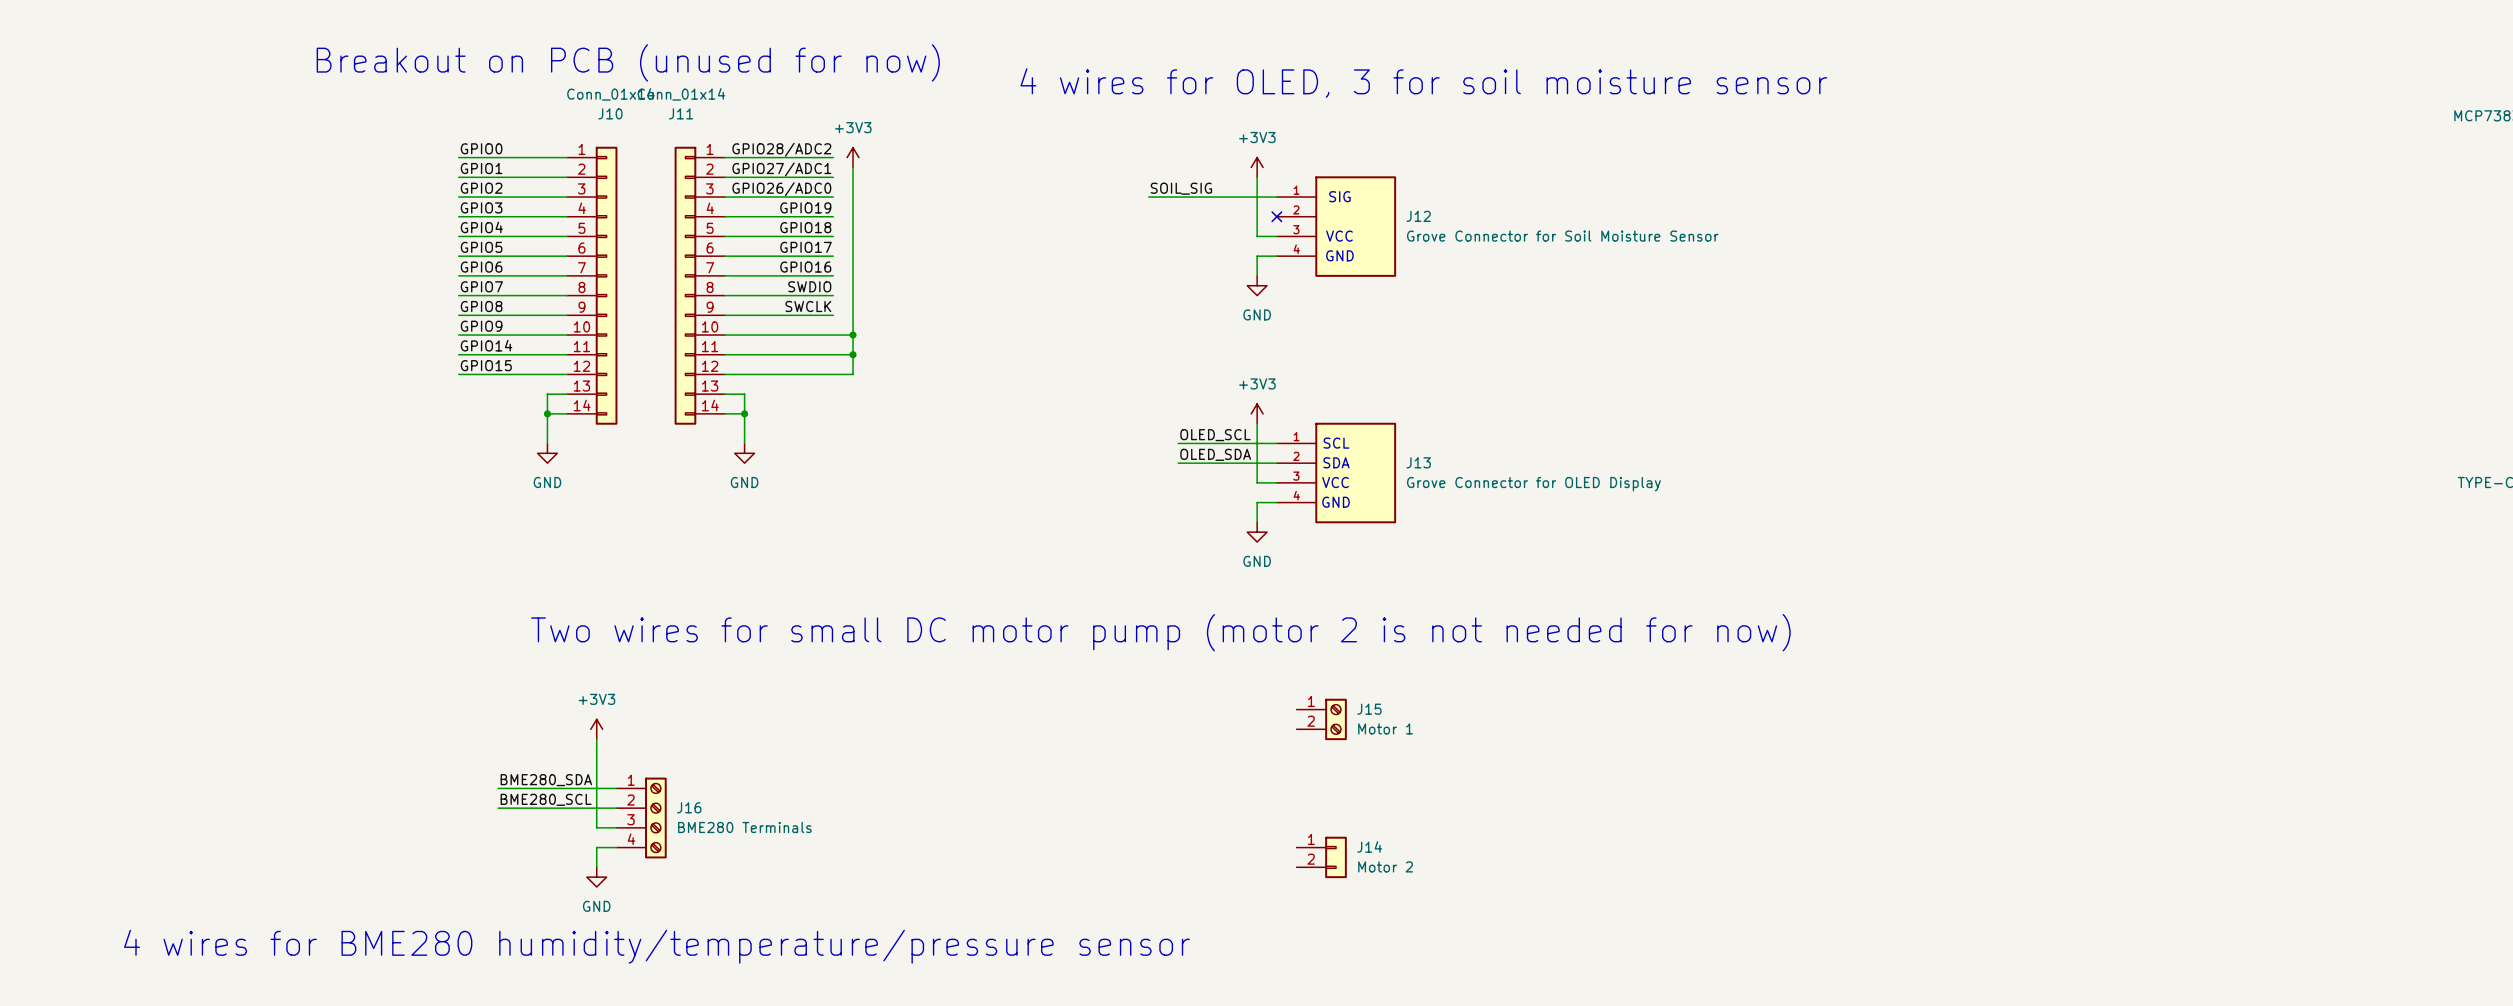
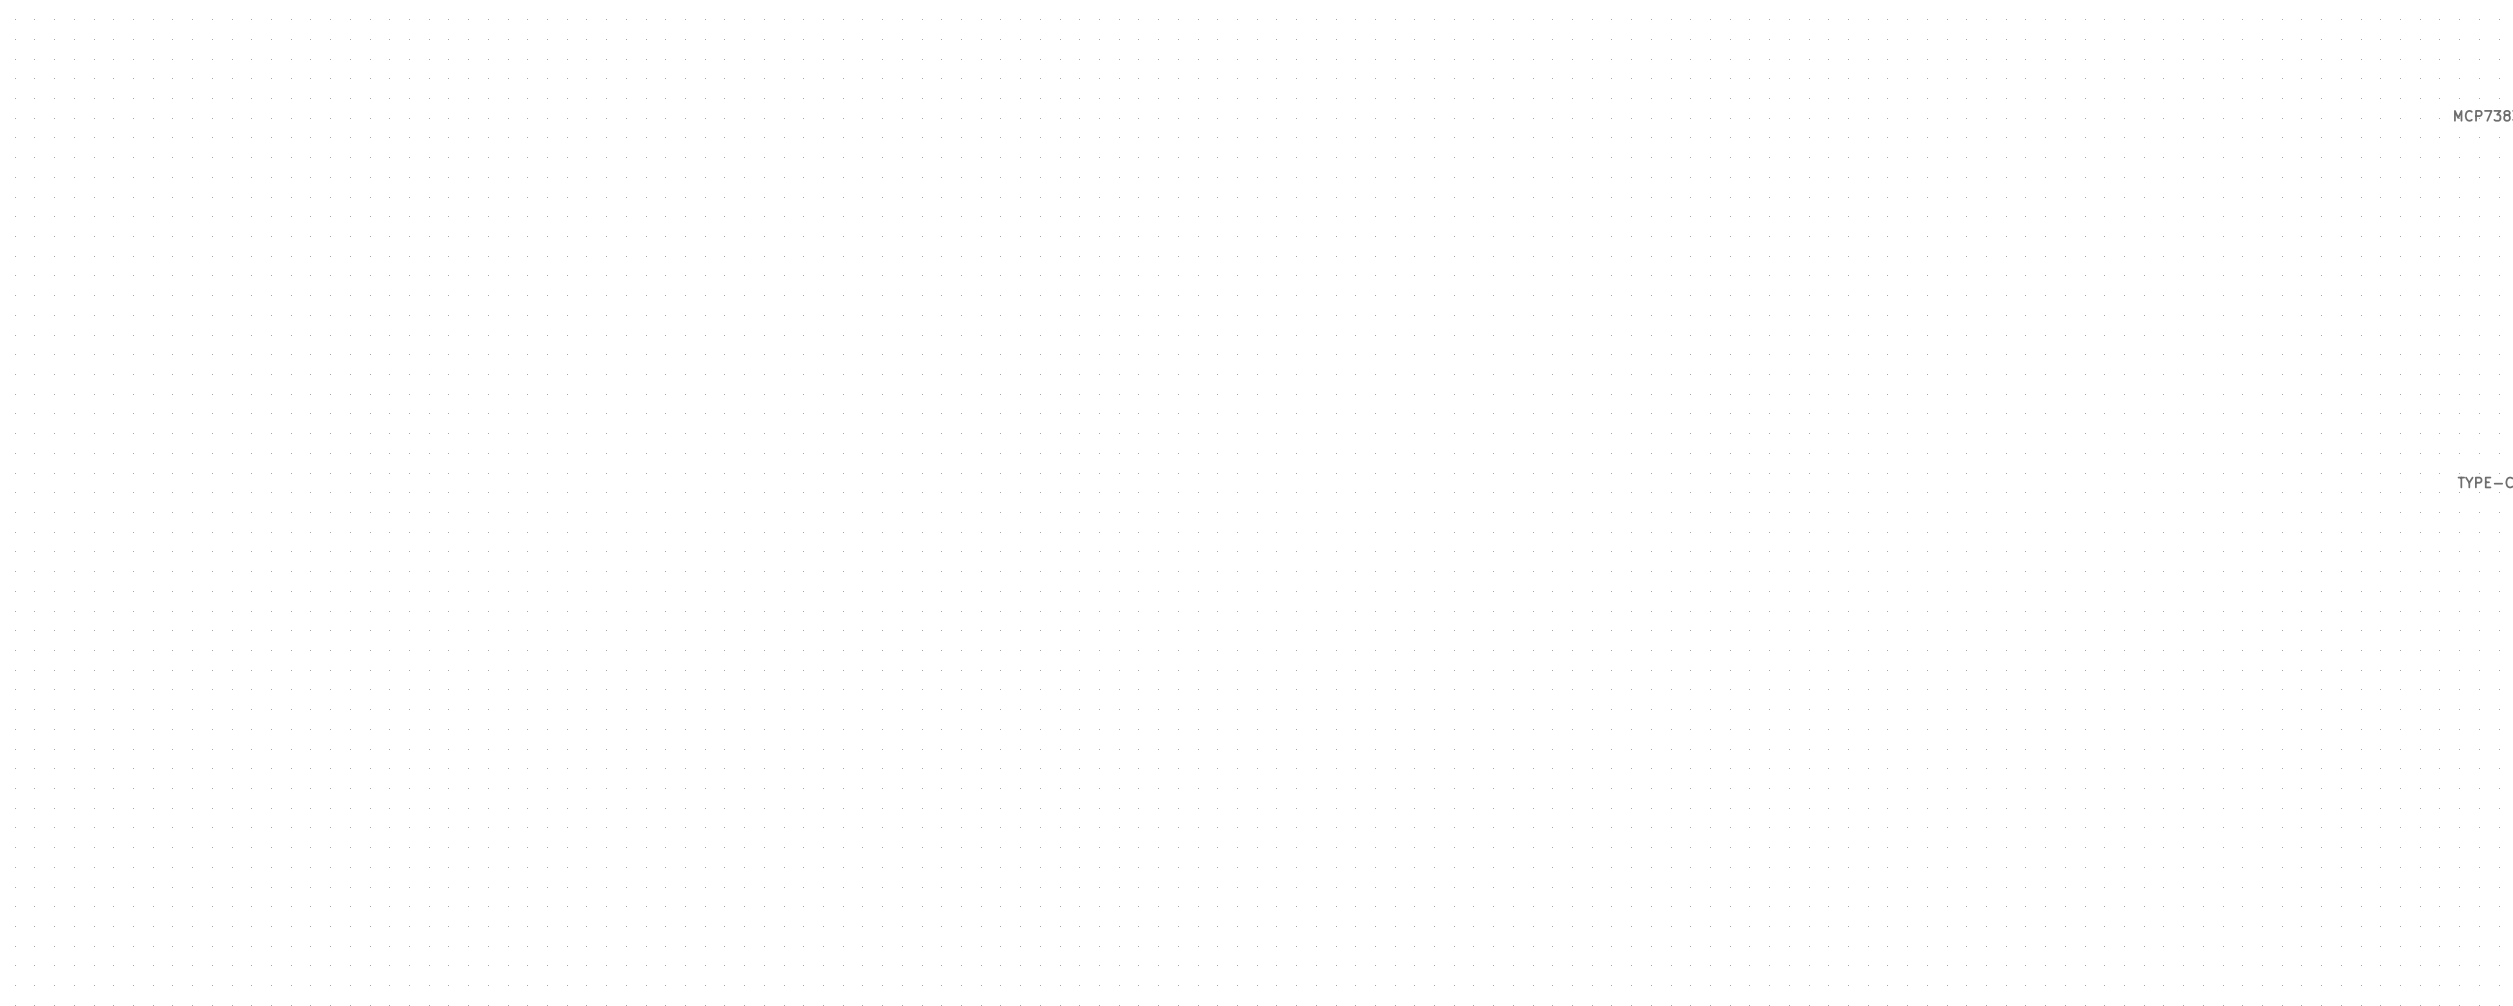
text: Breakout on PCB (unused for now) (628, 62) -> none
text: 4 wires for OLED, 3 for soil moisture sensor (1423, 82) -> none
label: GPIO0 (481, 148) -> none
label: GPIO28/ADC2 (781, 149) -> none
wire: (458, 157) (567, 157) -> none
wire: (724, 157) (833, 157) -> none
power symbol: +3V3 (853, 157) -> none
wire: (853, 167) (853, 374) (724, 374) -> none
power symbol: +3V3 (1257, 167) -> none
label: GPIO1 (481, 168) -> none
label: GPIO27/ADC1 (781, 169) -> none
wire: (458, 177) (567, 177) -> none
wire: (724, 177) (833, 177) -> none
wire: (1257, 177) (1257, 236) (1276, 236) -> none
label: GPIO2 (481, 188) -> none
label: SOIL_SIG (1181, 188) -> none
label: GPIO26/ADC0 (781, 189) -> none
text: SIG (1339, 196) -> none
wire: (458, 197) (567, 197) -> none
wire: (724, 197) (833, 197) -> none
wire: (1148, 197) (1276, 197) -> none
label: GPIO3 (481, 207) -> none
label: GPIO19 (805, 207) -> none
wire: (458, 216) (567, 216) -> none
wire: (724, 216) (833, 216) -> none
no-connect mark: (1276, 216) -> none
J12: Grove Connector for Soil Moisture Sensor (1336, 226) -> none
label: GPIO4 (481, 227) -> none
label: GPIO18 (805, 227) -> none
wire: (458, 236) (567, 236) -> none
wire: (724, 236) (833, 236) -> none
text: VCC (1339, 236) -> none
label: GPIO5 (481, 247) -> none
label: GPIO17 (806, 247) -> none
text: GND (1339, 255) -> none
wire: (458, 256) (567, 256) -> none
wire: (724, 256) (833, 256) -> none
wire: (1276, 256) (1257, 256) (1257, 275) -> none
label: GPIO6 (481, 267) -> none
label: GPIO16 (805, 267) -> none
wire: (458, 275) (567, 275) -> none
wire: (724, 275) (833, 275) -> none
J10: Conn_01x14 (592, 285) -> none
J11: Conn_01x14 (699, 285) -> none
power symbol: GND (1257, 285) -> none
label: GPIO7 (481, 286) -> none
label: SWDIO (809, 286) -> none
wire: (458, 295) (567, 295) -> none
wire: (724, 295) (833, 295) -> none
label: GPIO8 (481, 306) -> none
label: SWCLK (808, 306) -> none
wire: (458, 315) (567, 315) -> none
wire: (724, 315) (833, 315) -> none
label: GPIO9 (481, 326) -> none
wire: (458, 335) (567, 335) -> none
wire: (724, 335) (853, 335) -> none
junction: (853, 335) -> none
label: GPIO14 (486, 345) -> none
wire: (458, 354) (567, 354) -> none
wire: (724, 354) (853, 354) -> none
junction: (853, 354) -> none
label: GPIO15 (486, 365) -> none
wire: (458, 374) (567, 374) -> none
wire: (567, 394) (547, 394) (547, 443) -> none
wire: (724, 394) (744, 394) (744, 443) -> none
wire: (547, 413) (567, 413) -> none
junction: (547, 413) -> none
wire: (724, 413) (744, 413) -> none
junction: (744, 413) -> none
power symbol: +3V3 (1257, 413) -> none
wire: (1257, 423) (1257, 482) (1276, 482) -> none
label: OLED_SCL (1215, 435) -> none
wire: (1178, 443) (1276, 443) -> none
text: SCL (1336, 443) -> none
power symbol: GND (547, 453) -> none
power symbol: GND (744, 453) -> none
label: OLED_SDA (1215, 454) -> none
text: SDA (1336, 462) -> none
wire: (1178, 463) (1276, 463) -> none
J13: Grove Connector for OLED Display (1336, 473) -> none
text: VCC (1335, 482) -> none
wire: (1276, 502) (1257, 502) (1257, 522) -> none
text: GND (1336, 502) -> none
power symbol: GND (1257, 532) -> none
text: Two wires for small DC motor pump (motor 2 is not needed for now) (1160, 632) -> none
J15: Motor 1 (1321, 719) -> none
power symbol: +3V3 (596, 729) -> none
wire: (596, 739) (596, 827) (616, 827) -> none
label: BME280_SDA (546, 780) -> none
wire: (498, 788) (616, 788) -> none
label: BME280_SCL (546, 799) -> none
wire: (498, 808) (616, 808) -> none
J16: BME280 Terminals (641, 818) -> none
wire: (616, 847) (596, 847) (596, 867) -> none
J14: Motor 2 (1321, 857) -> none
power symbol: GND (596, 877) -> none
text: 4 wires for BME280 humidity/temperature/pressure sensor (657, 946) -> none

